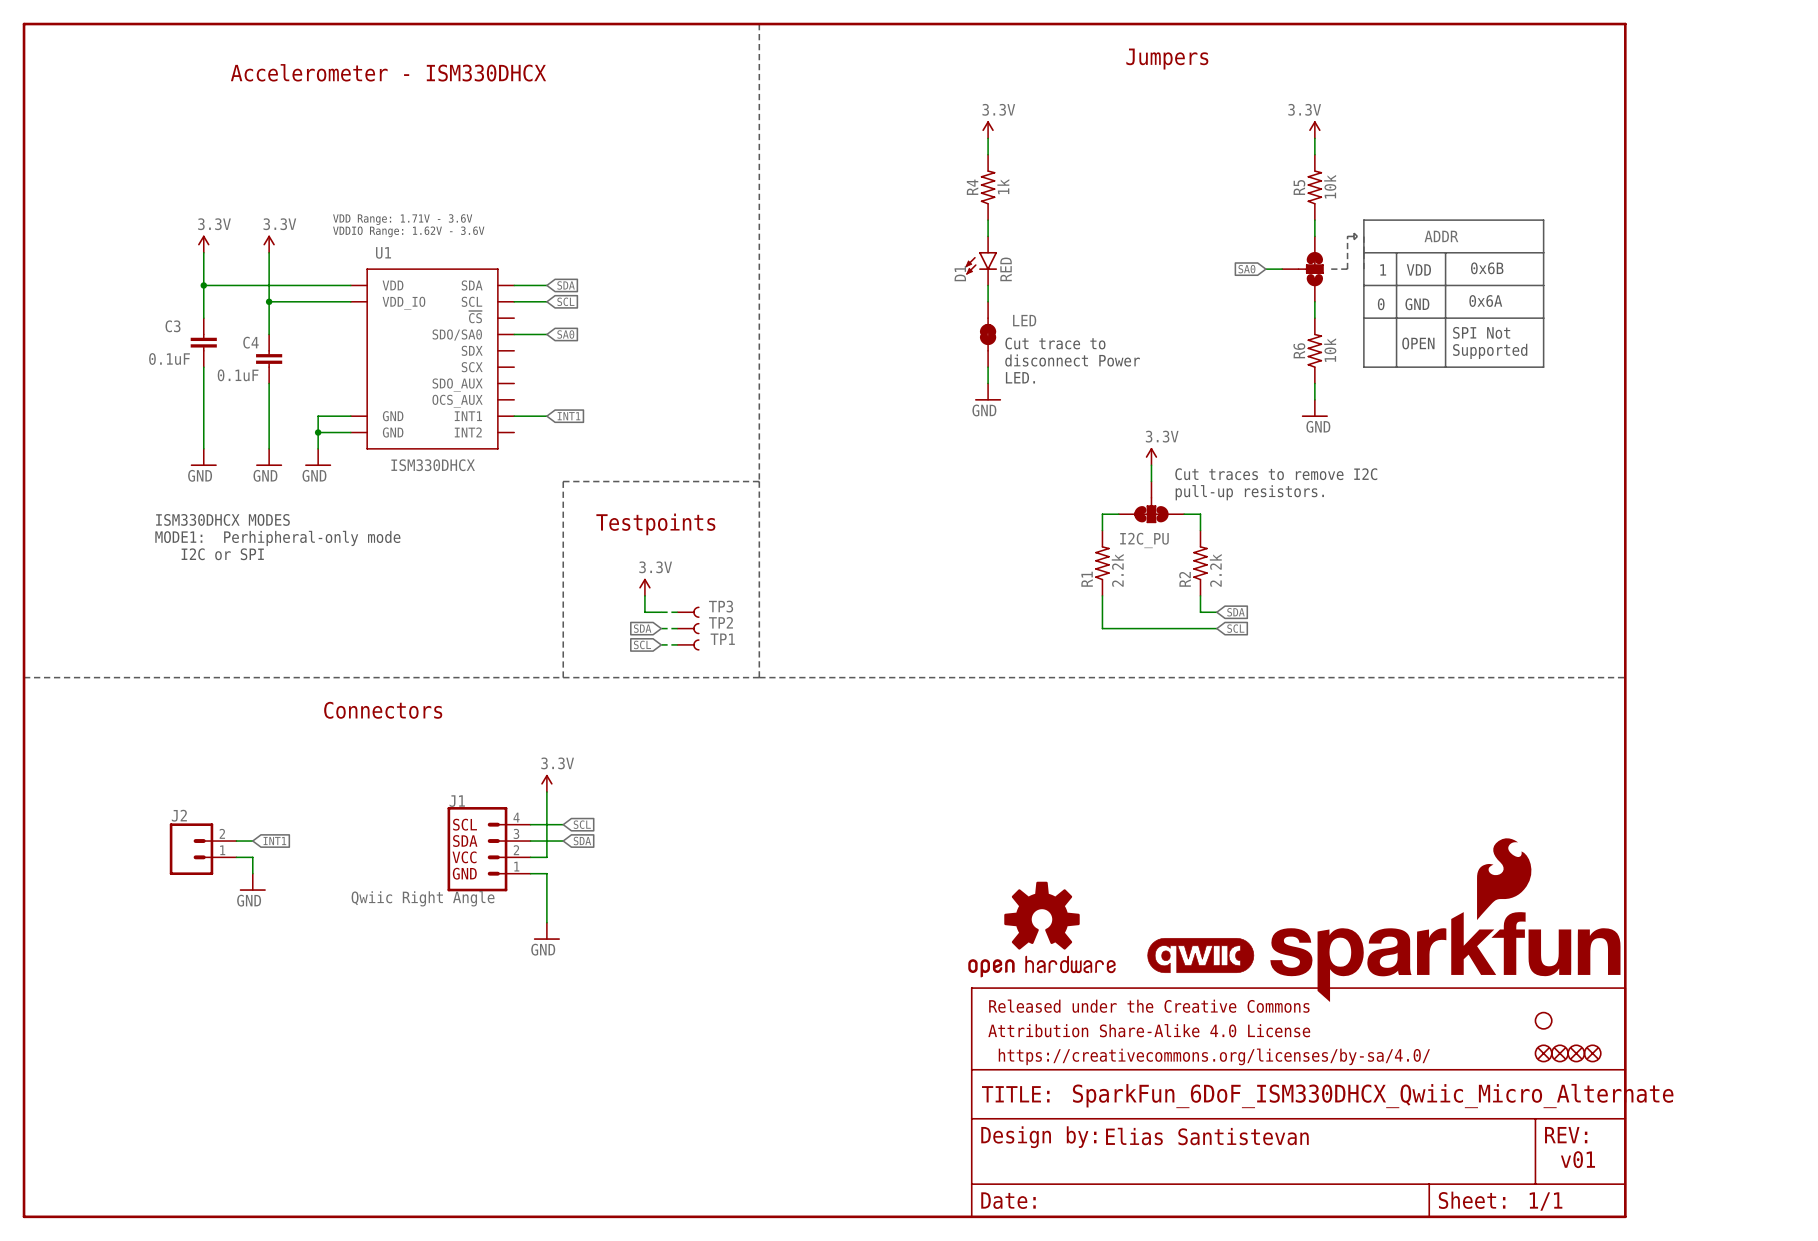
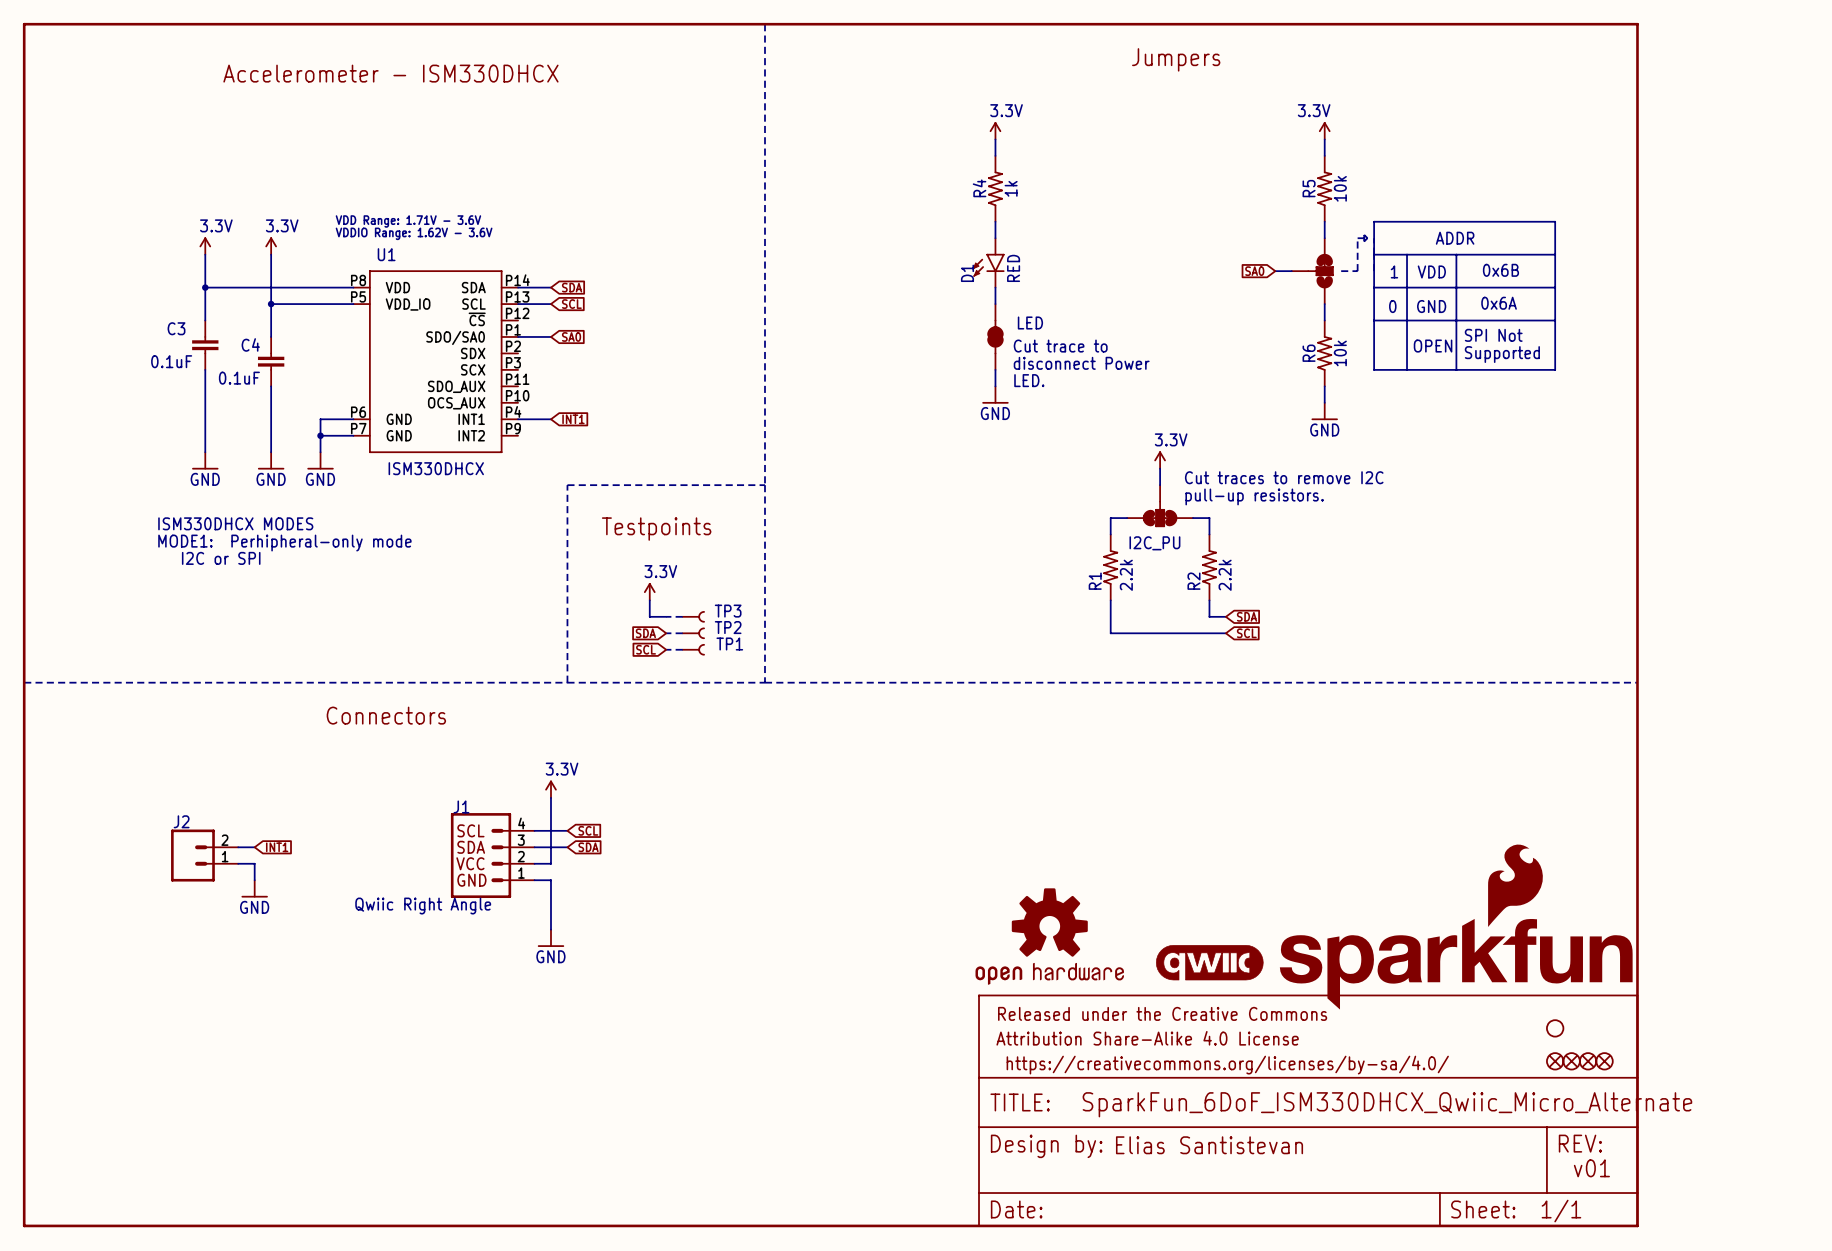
U1 symbol: [350, 268, 515, 450] -> [353, 270, 519, 453]

